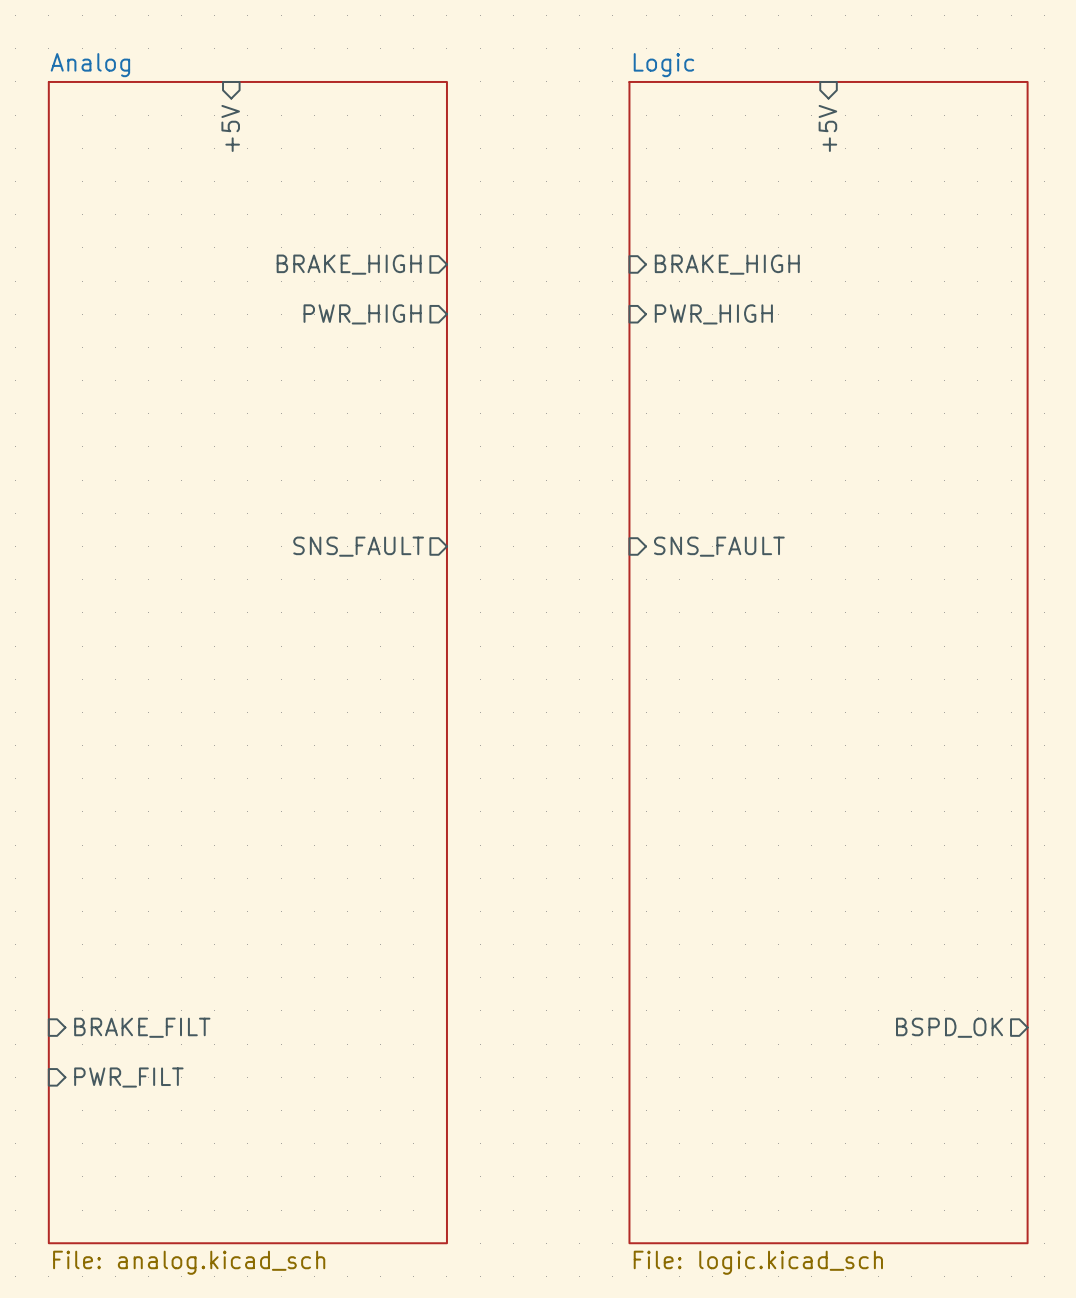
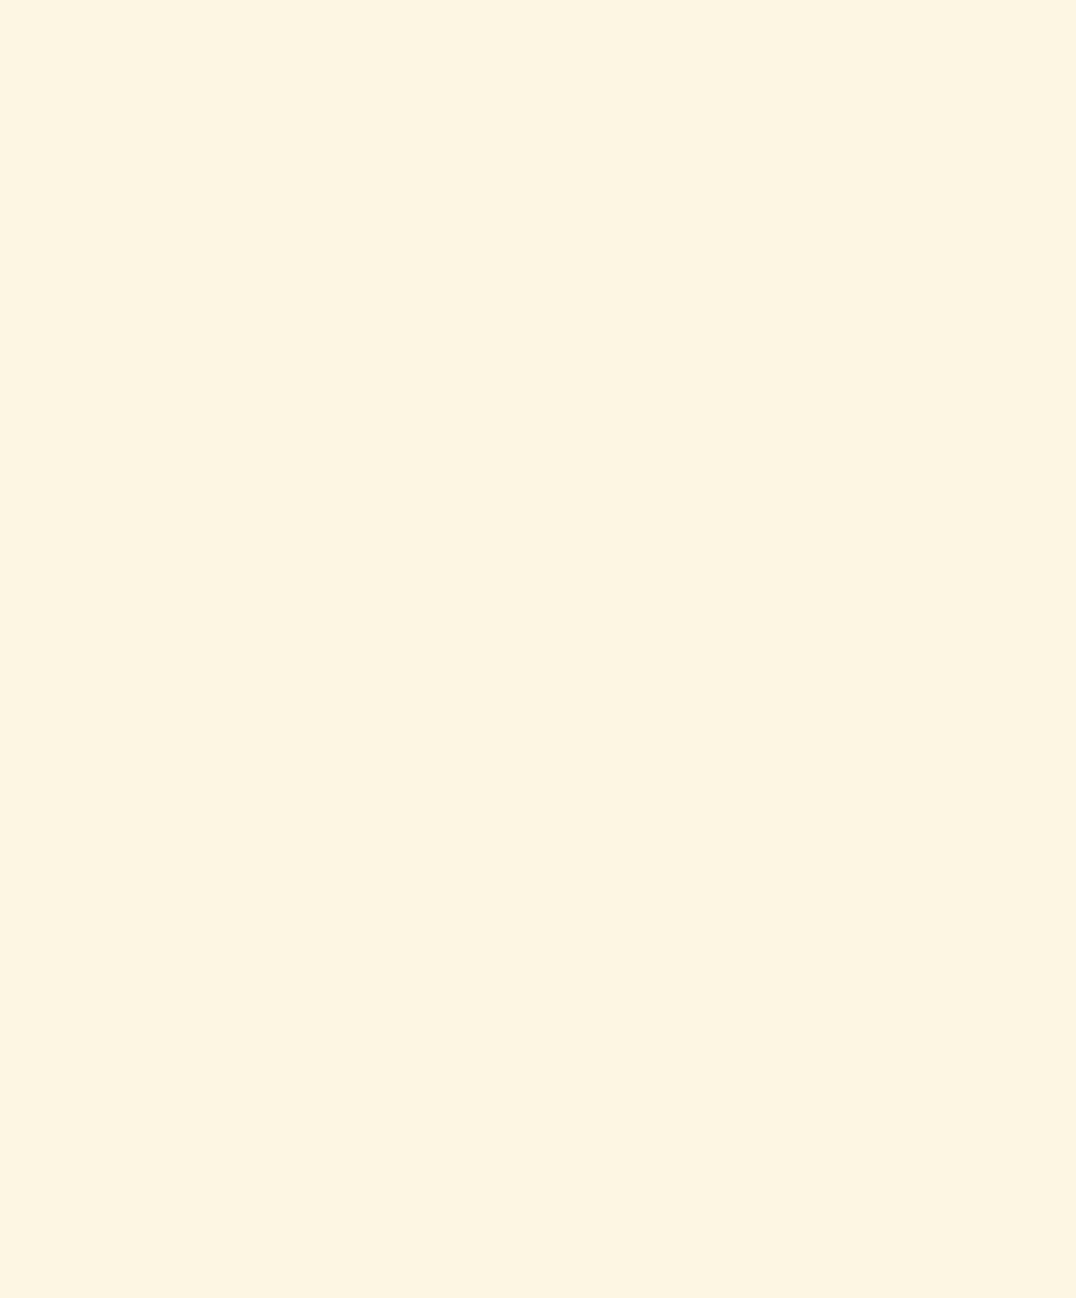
sheet pin: +5V (230, 128) -> none
sheet pin: +5V (827, 128) -> none
sheet pin: BRAKE_HIGH (349, 264) -> none
sheet pin: BRAKE_HIGH (727, 264) -> none
sheet pin: PWR_HIGH (362, 314) -> none
sheet pin: PWR_HIGH (713, 314) -> none
sheet pin: SNS_FAULT (358, 546) -> none
sheet pin: SNS_FAULT (719, 546) -> none
sheet Analog: File: analog.kicad_sch (247, 662) -> none
sheet Logic: File: logic.kicad_sch (828, 662) -> none
sheet pin: BRAKE_FILT (142, 1027) -> none
sheet pin: BSPD_OK (949, 1027) -> none
sheet pin: PWR_FILT (128, 1077) -> none

